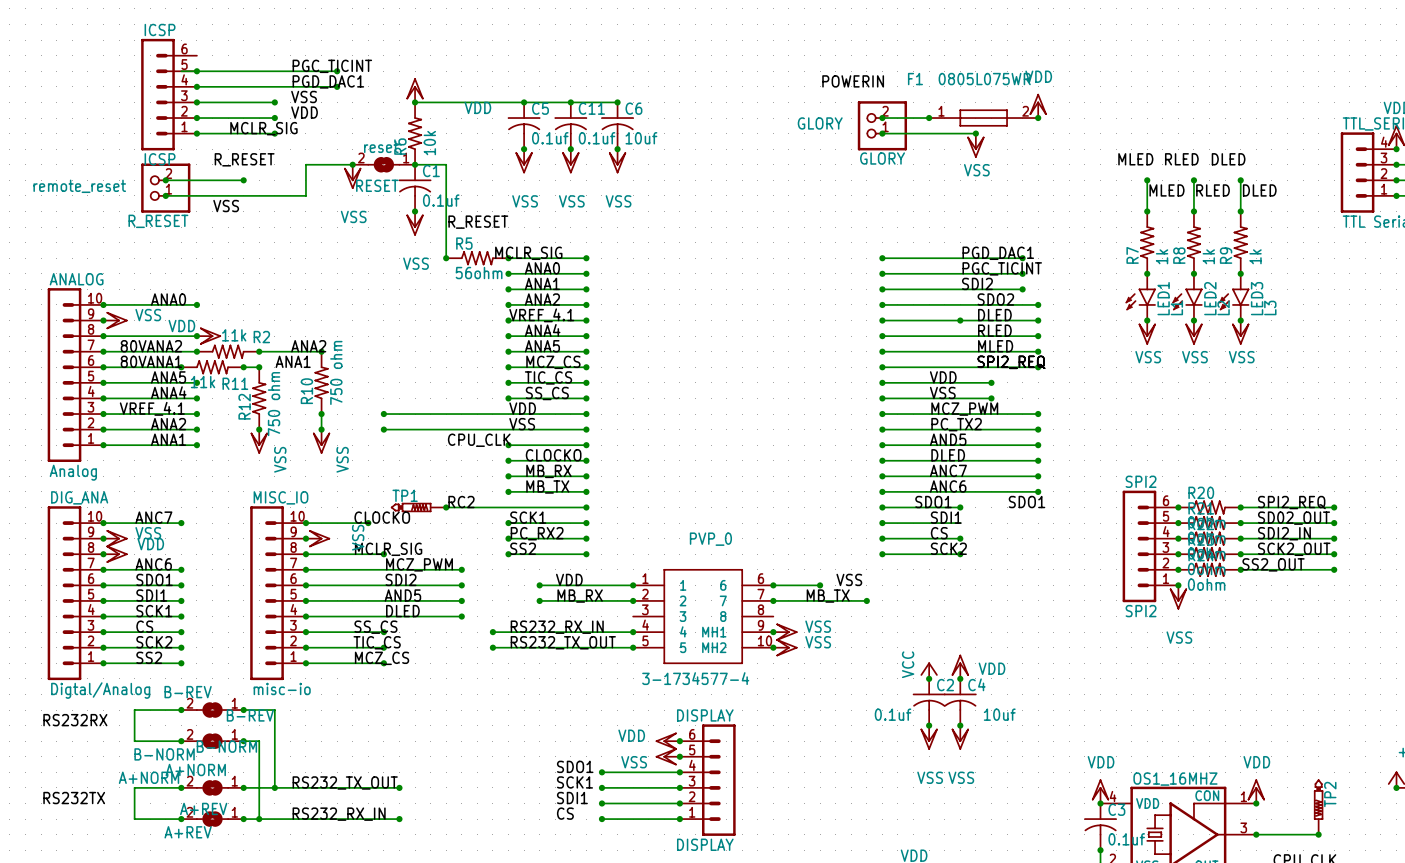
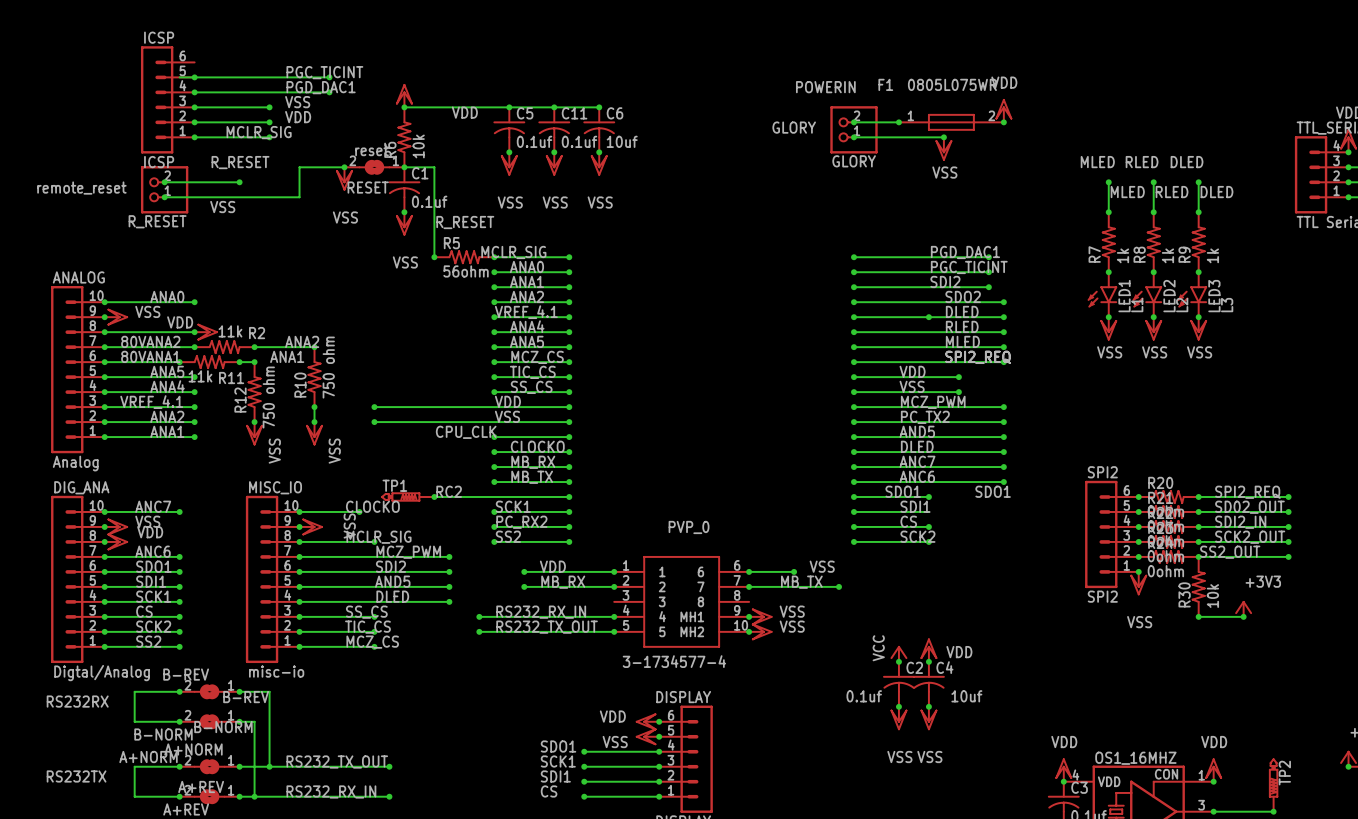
R30: none -> 10k (1198, 586)
power symbol: none -> +3V3 (1243, 609)
wire: none -> (1198, 616) (1243, 616)
junction: none -> (1198, 616)
junction: none -> (1243, 616)

